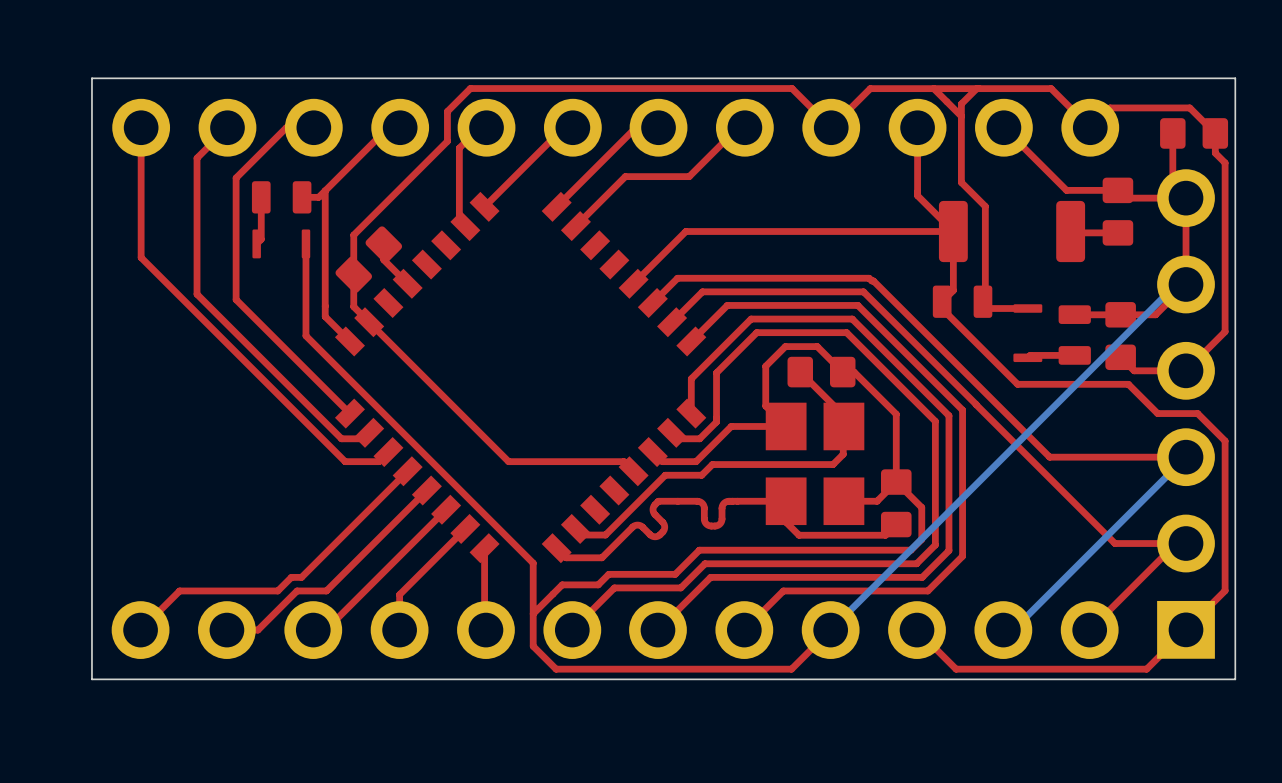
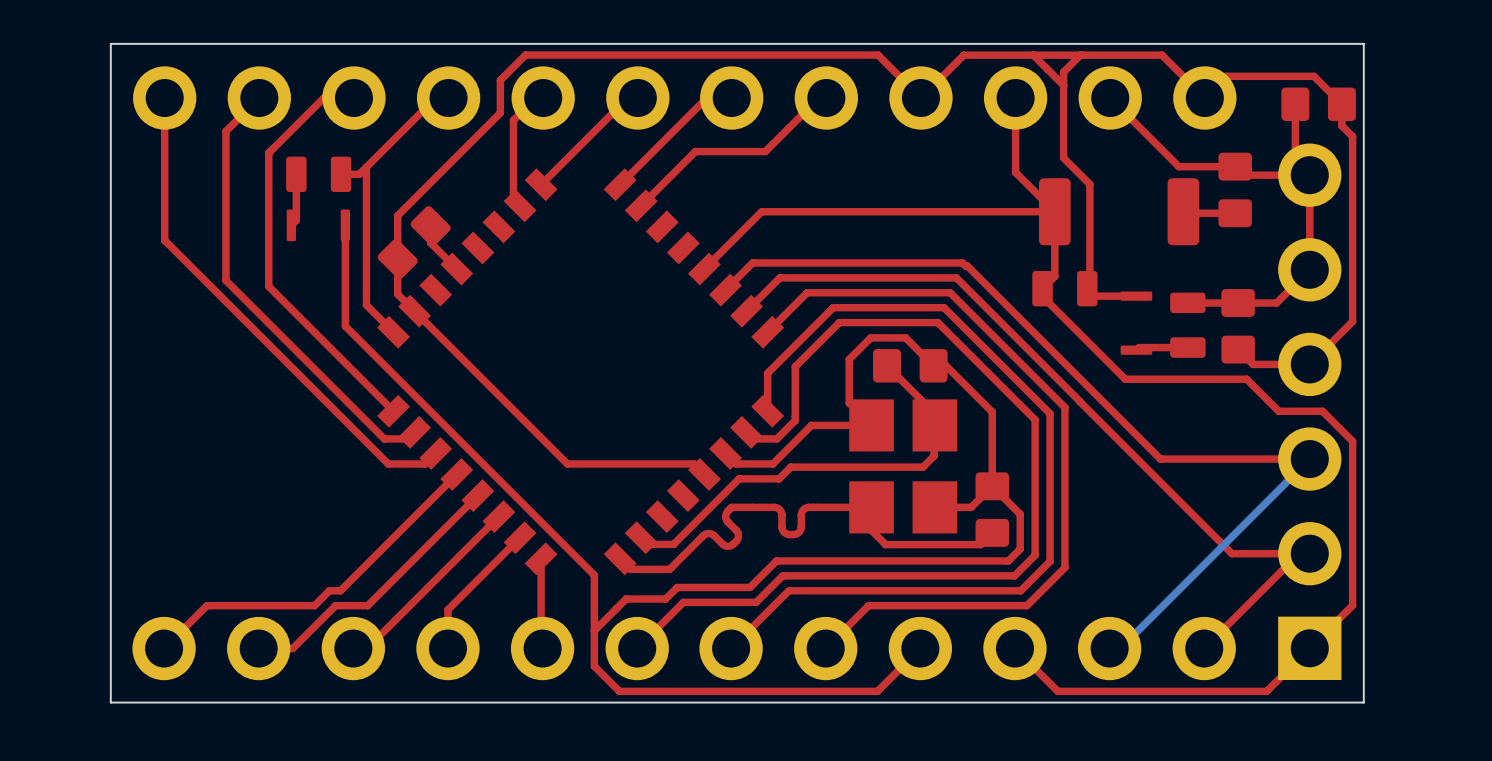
bottom track: (1176, 284) (830, 630) -> none

